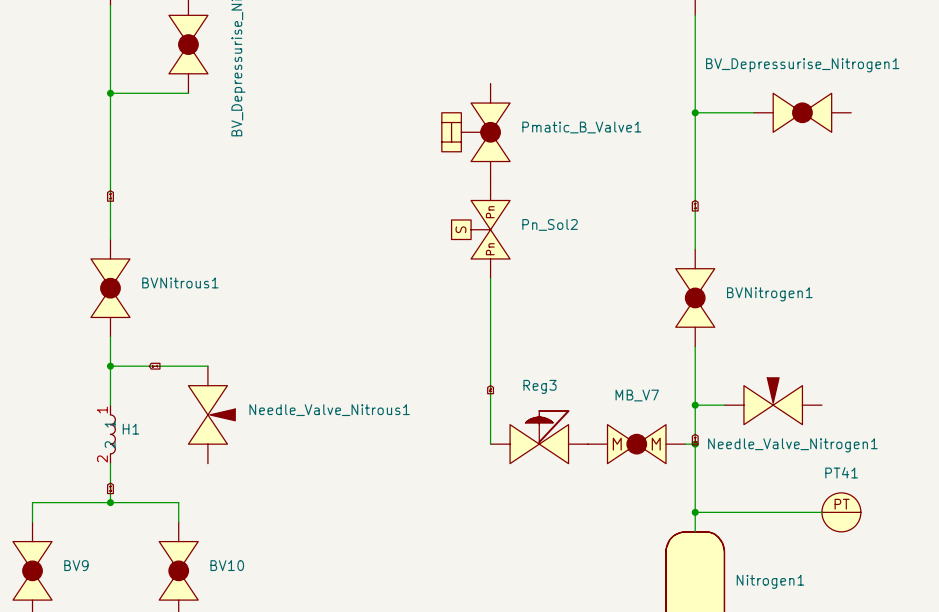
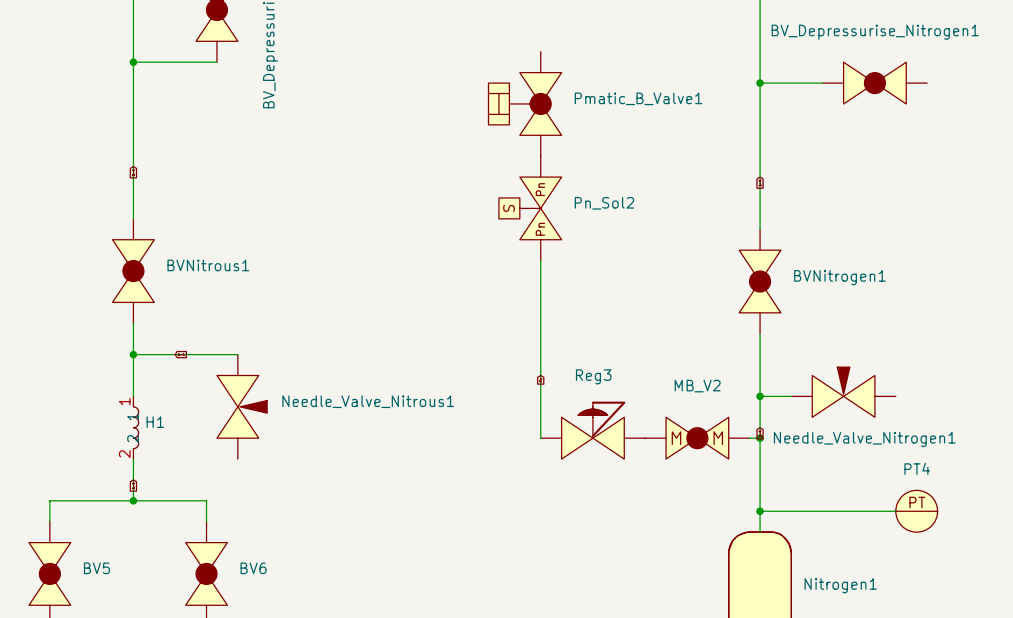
MB_V7 name: MB_V7 (637, 395) -> MB_V2 (697, 386)
PT41 name: PT41 (841, 472) -> PT4 (917, 468)
BV9 name: BV9 (76, 565) -> BV5 (96, 568)
BV10 name: BV10 (227, 565) -> BV6 (253, 568)

